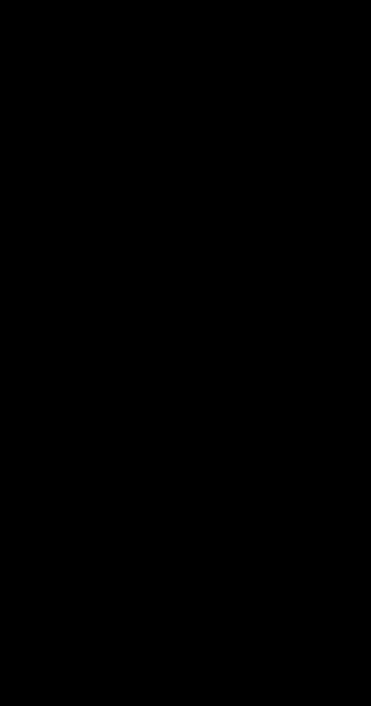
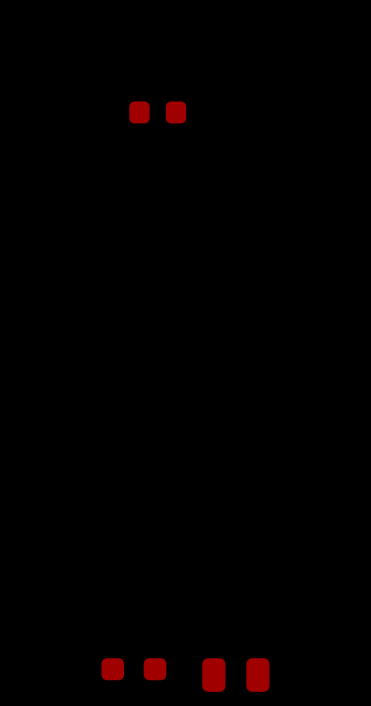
part: none -> (157, 112)
part: none -> (133, 669)
part: none -> (235, 675)

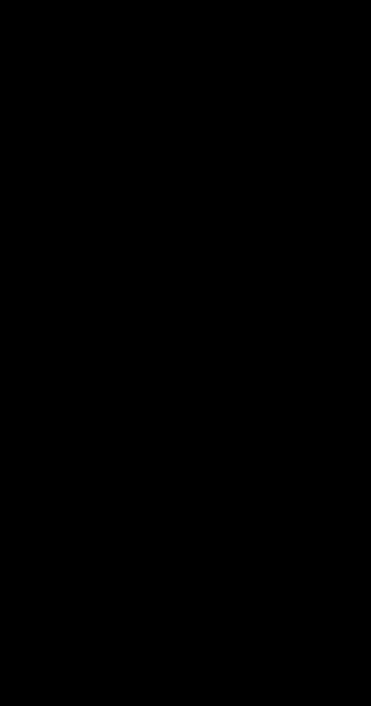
part: (157, 112) -> none
part: (133, 669) -> none
part: (235, 675) -> none

